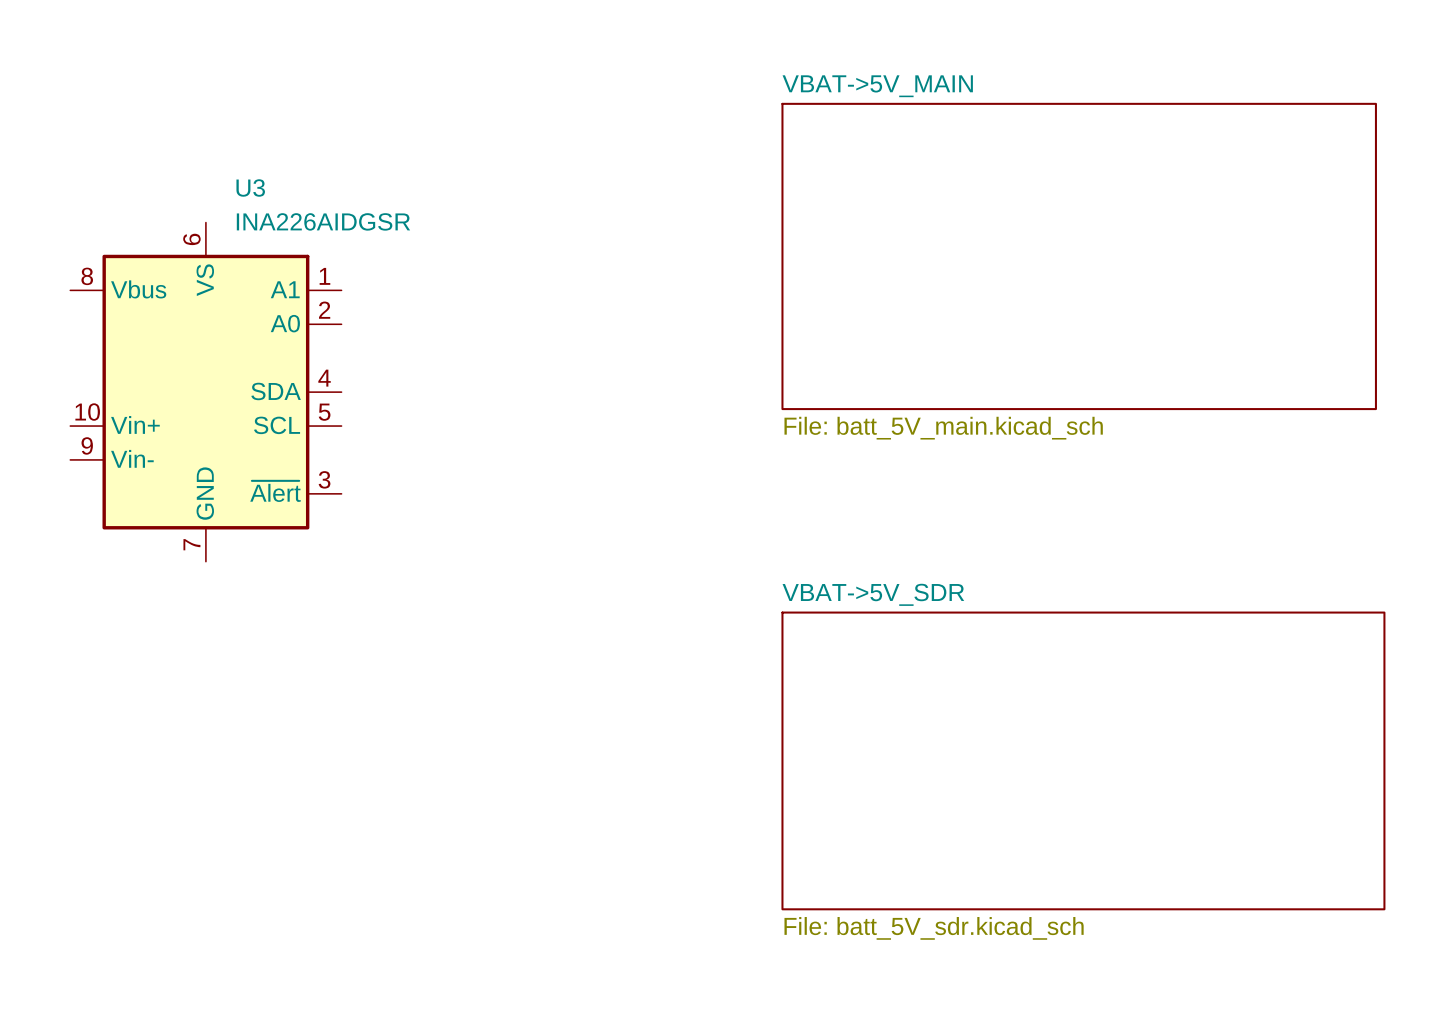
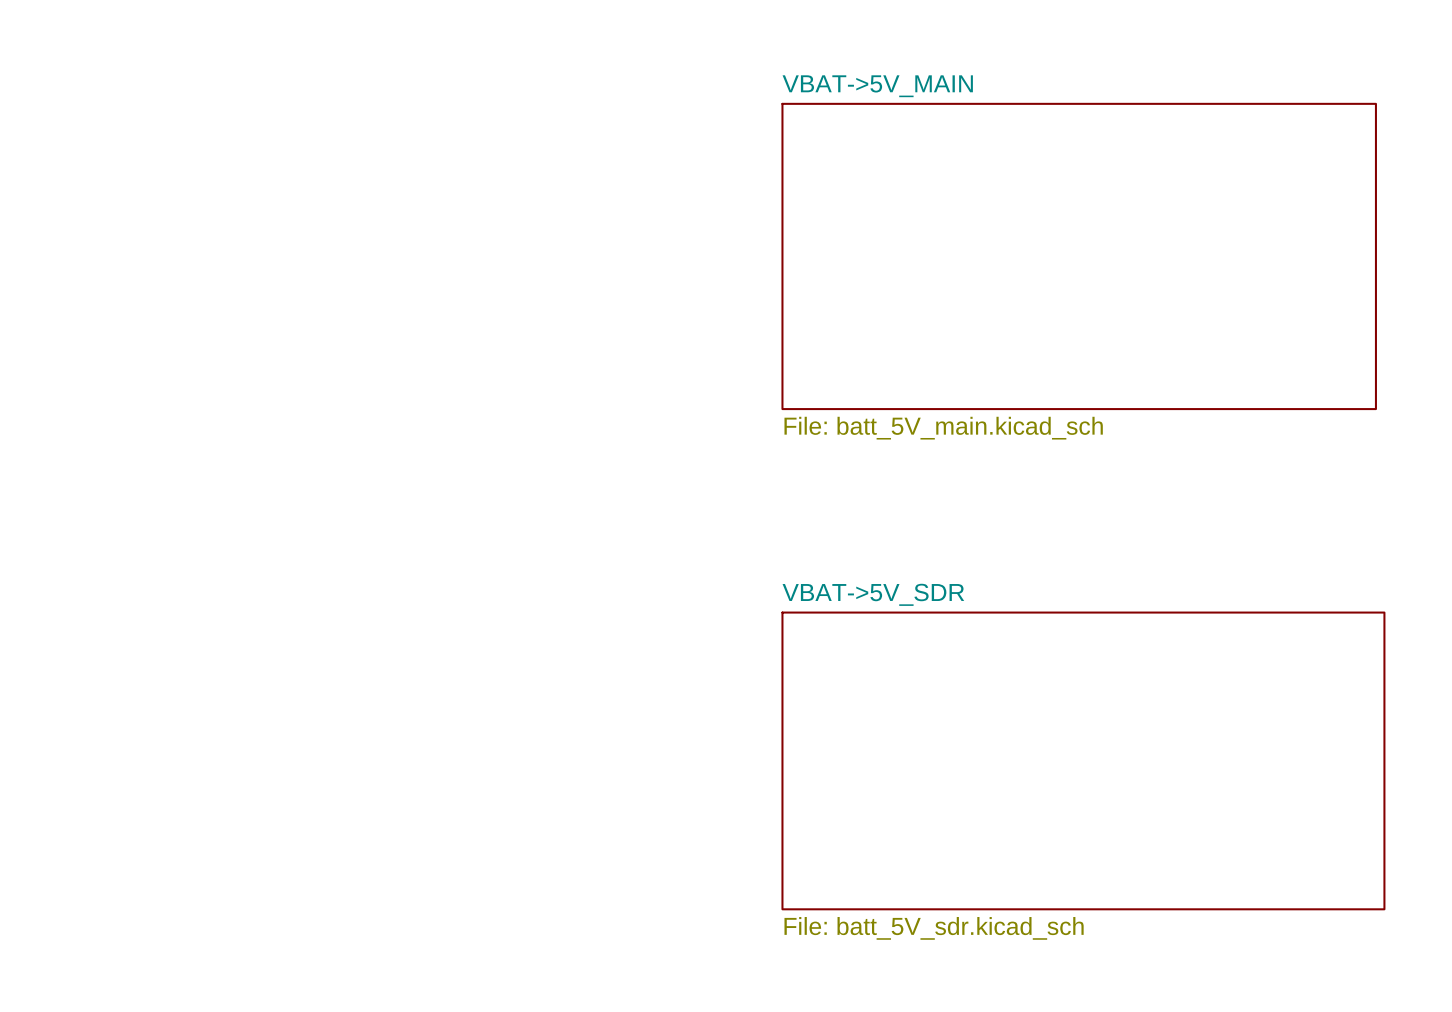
U3: INA226AIDGSR (205, 392) -> none

